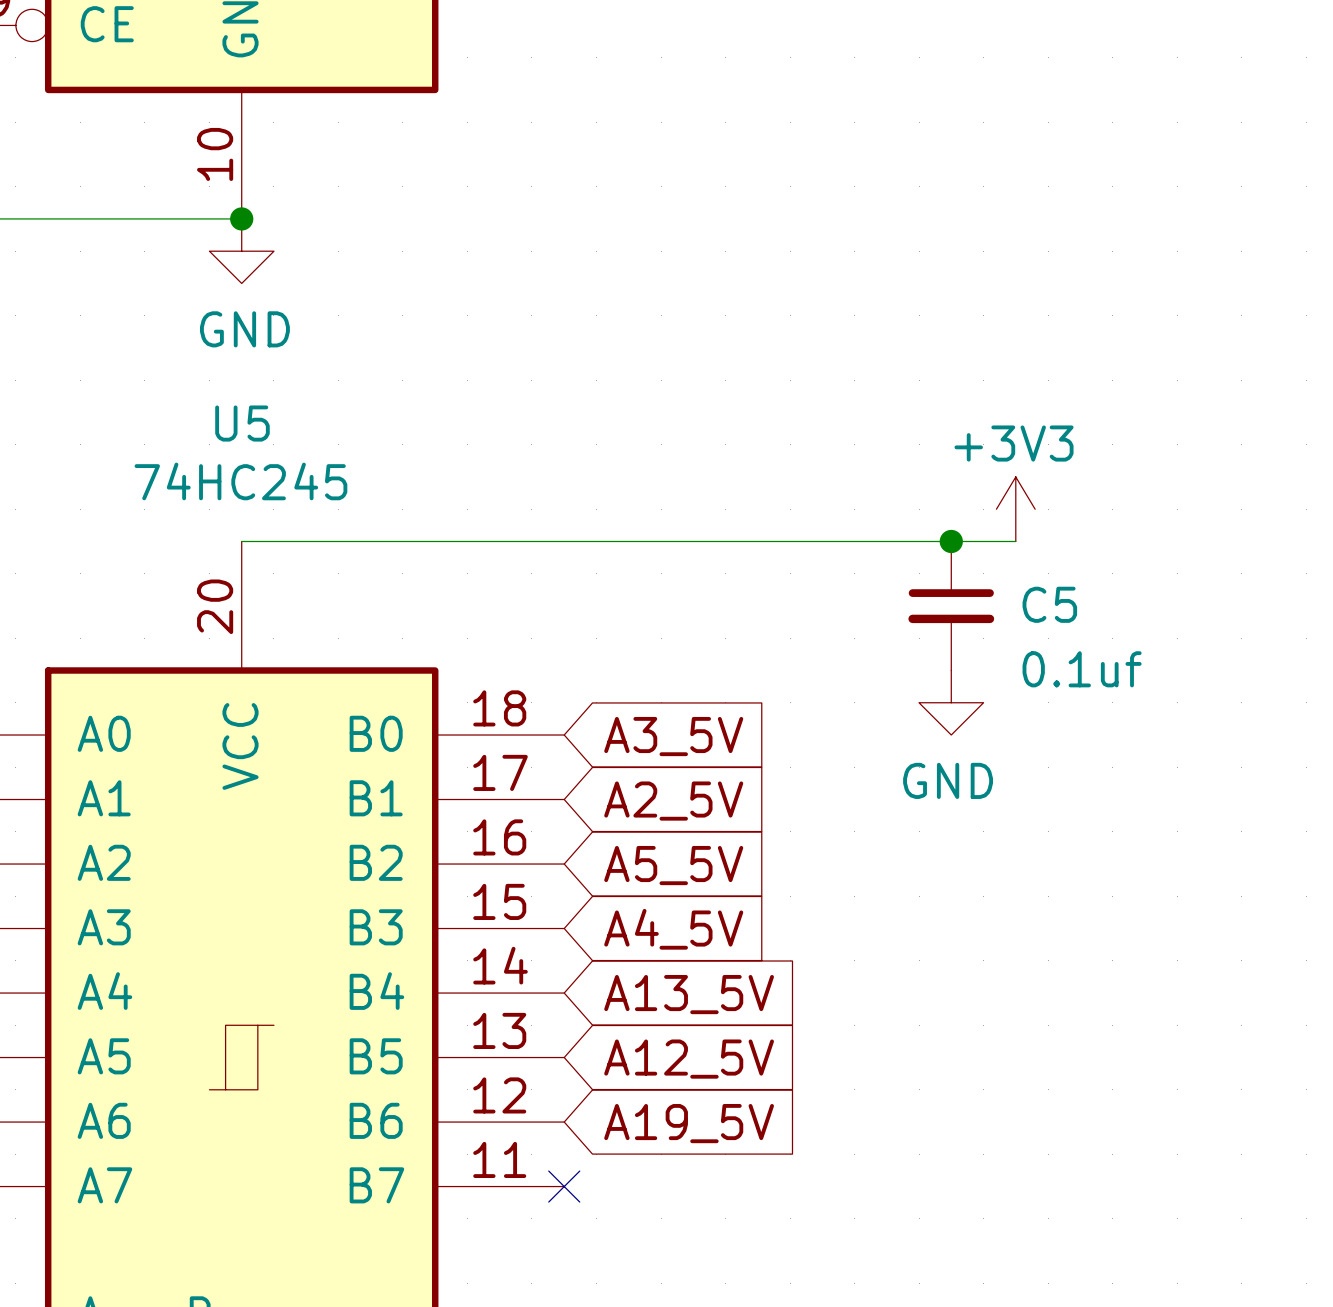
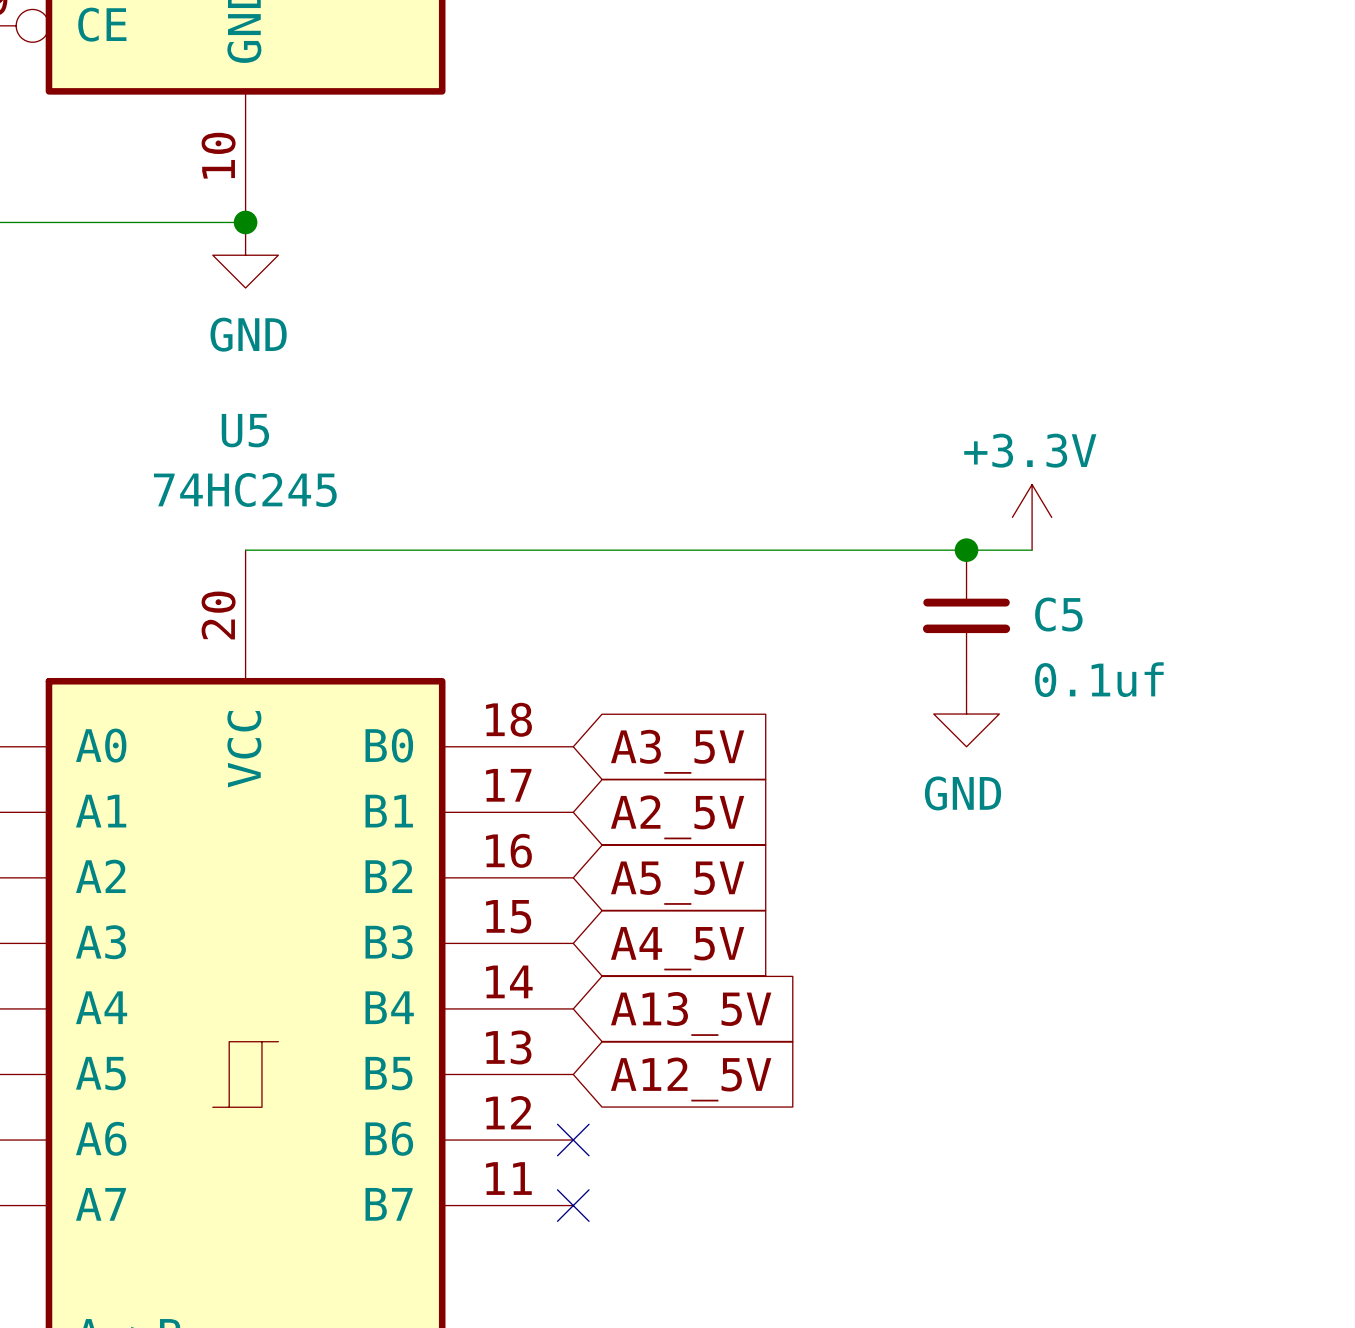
power symbol: +3V3 (1015, 509) -> +3.3V (1032, 517)
no-connect mark: none -> (573, 1140)
global label: A19_5V (689, 1123) -> none

